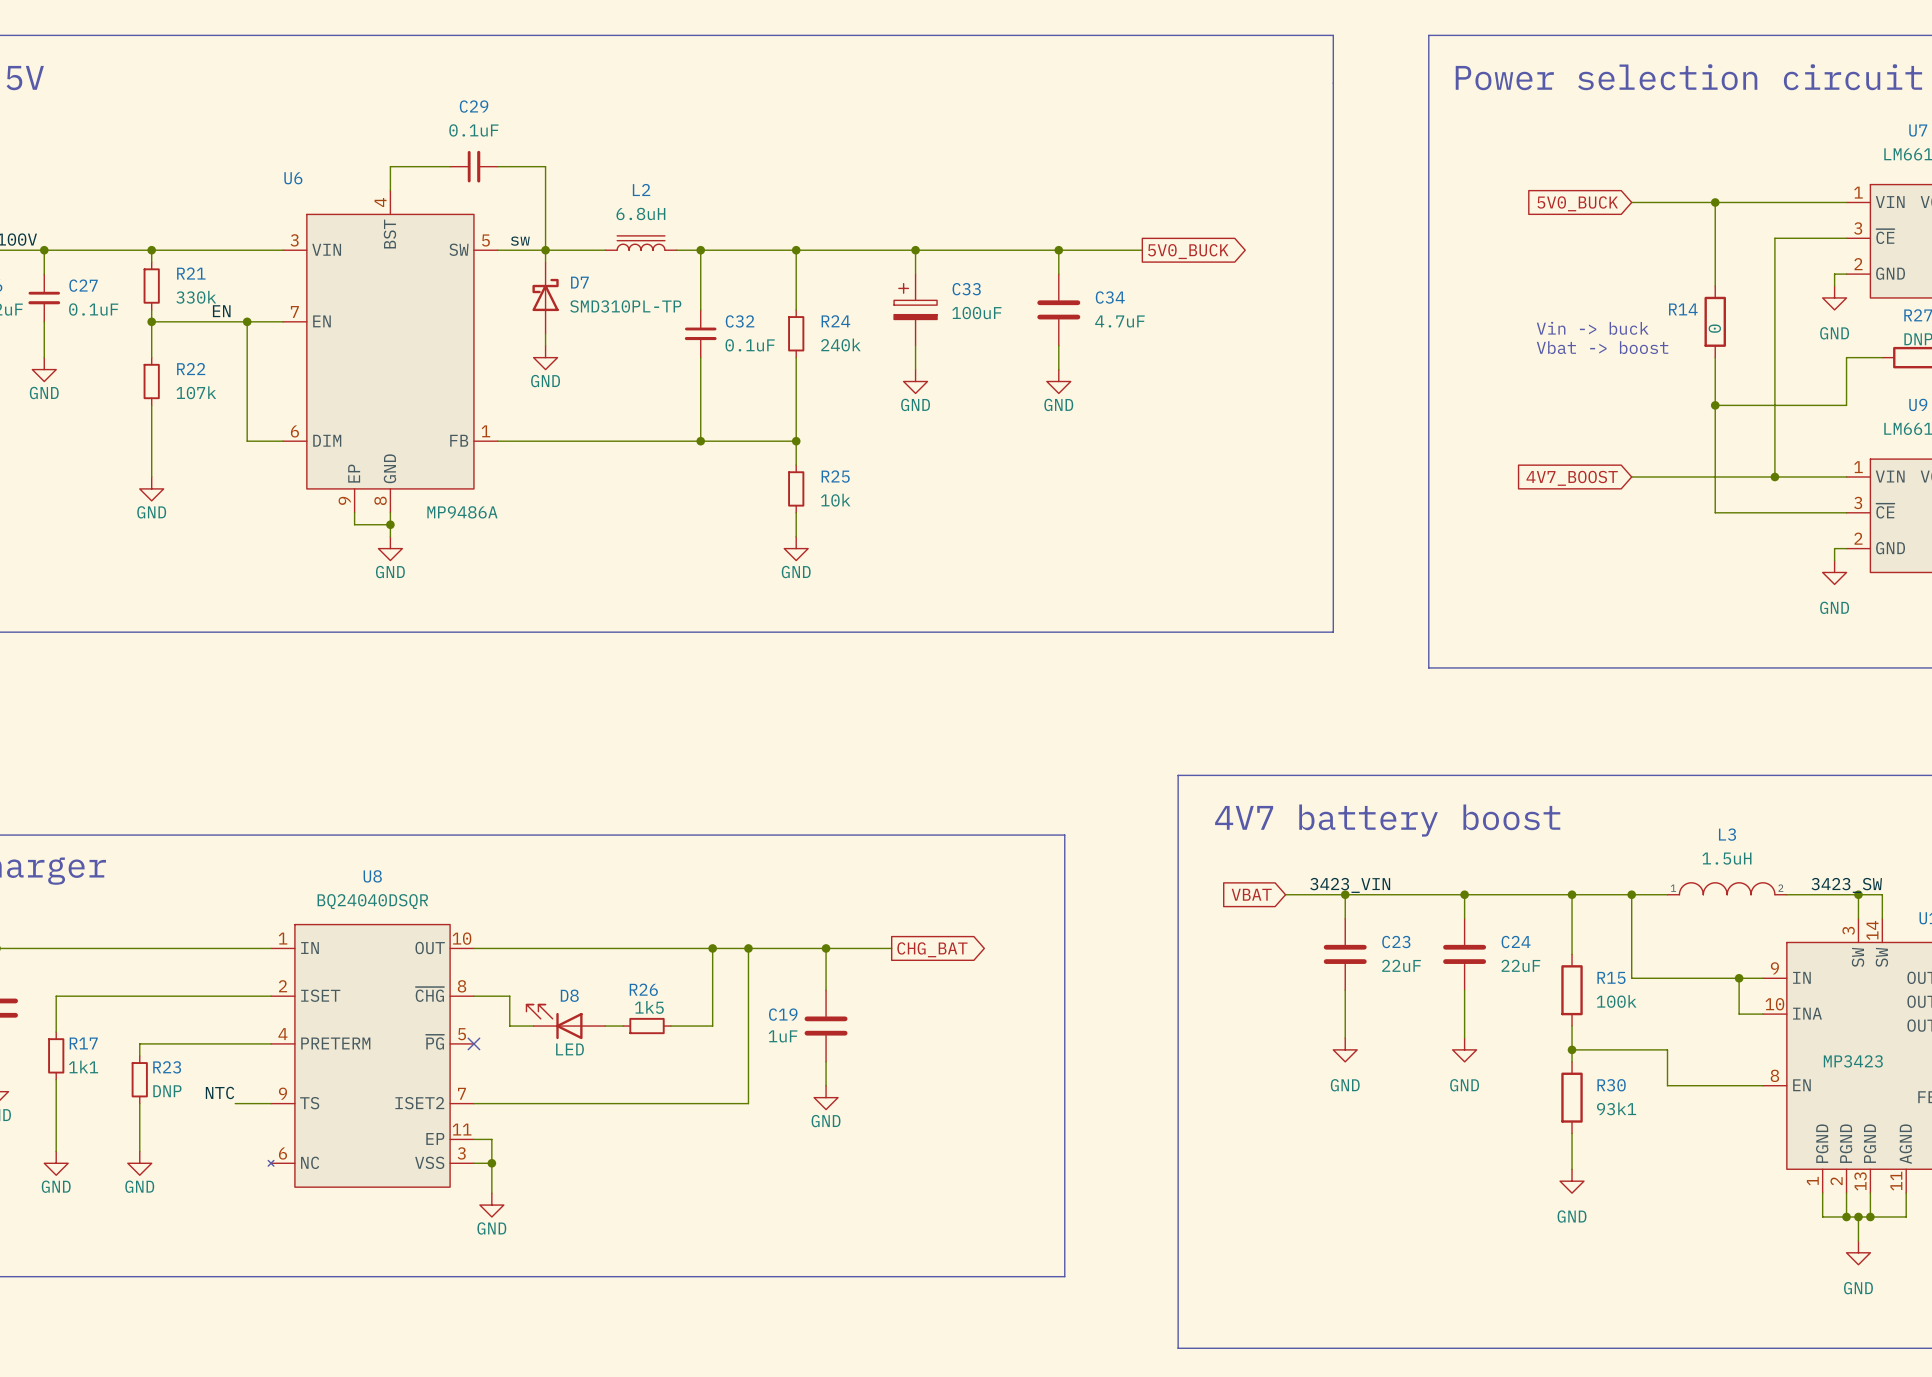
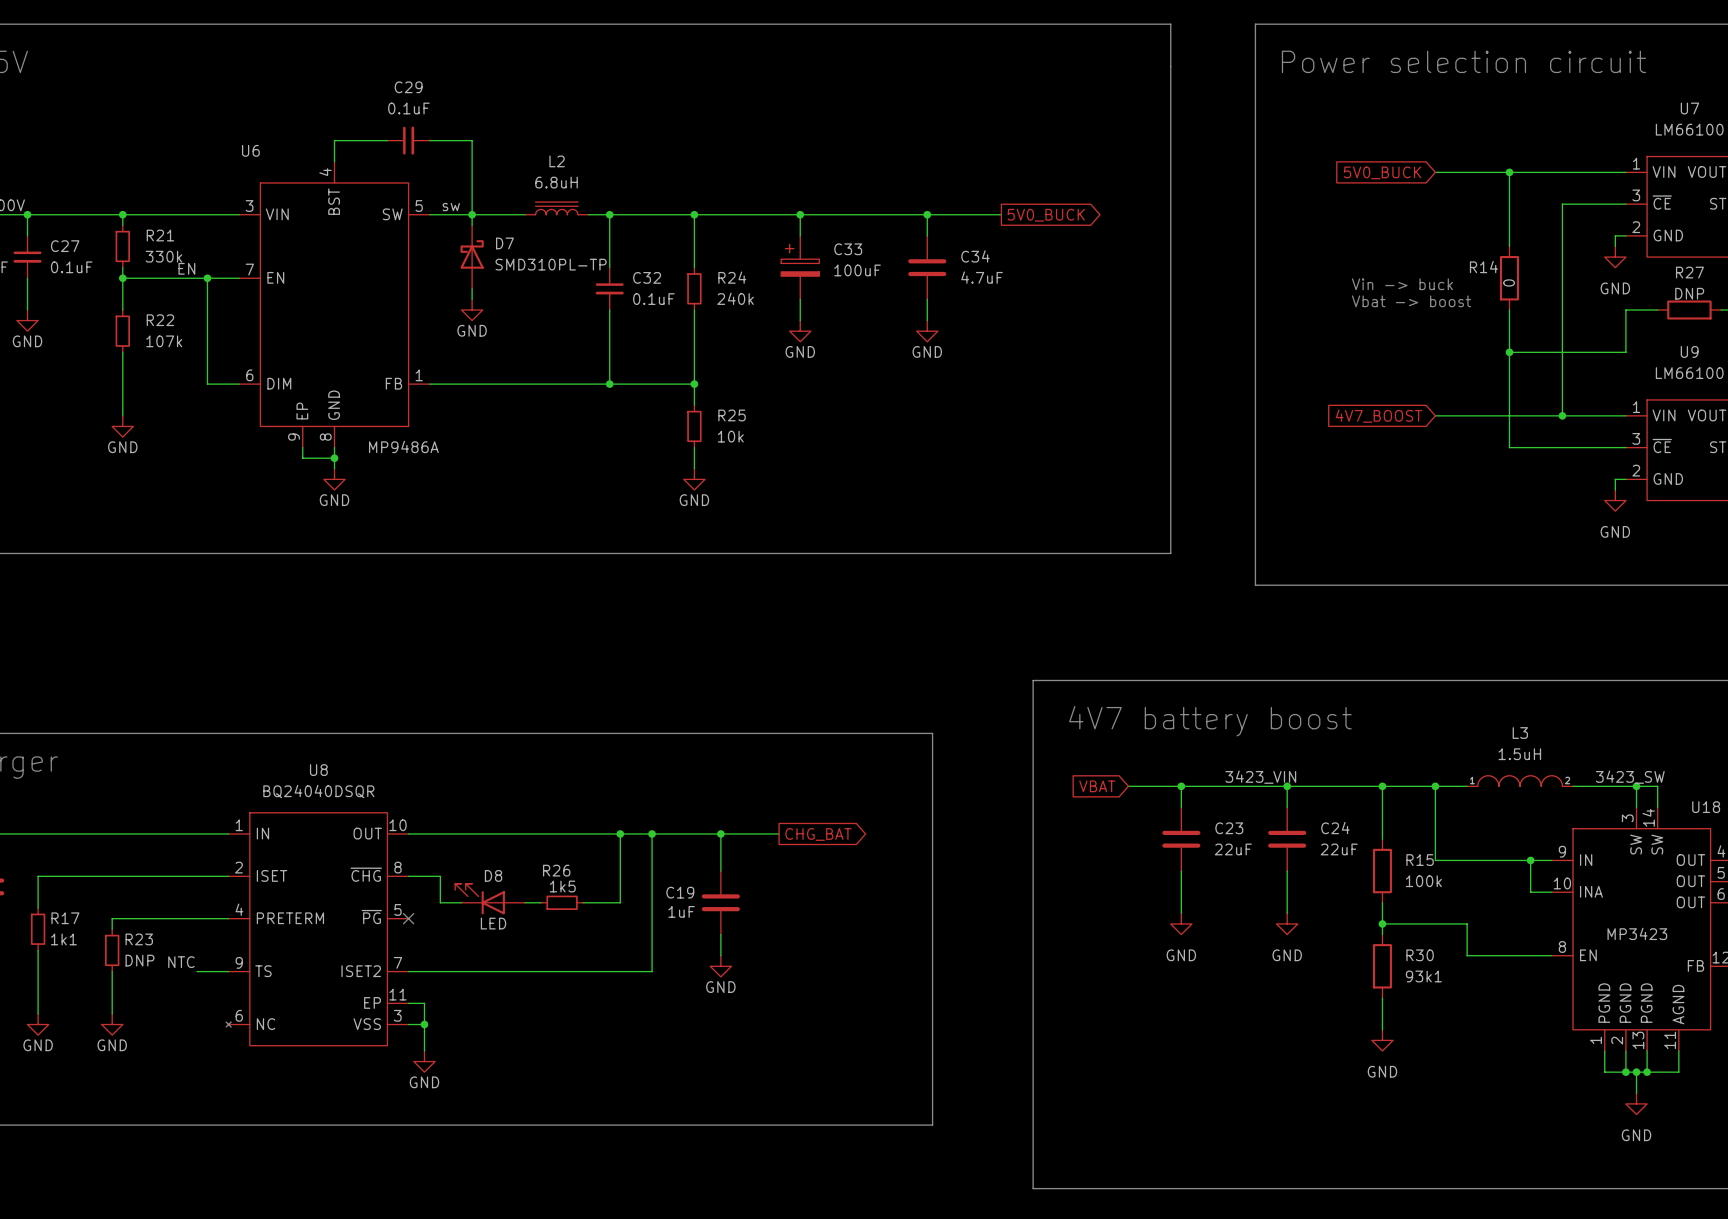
label position: 3423_VIN (1350, 885) -> 3423_VIN (1260, 777)

